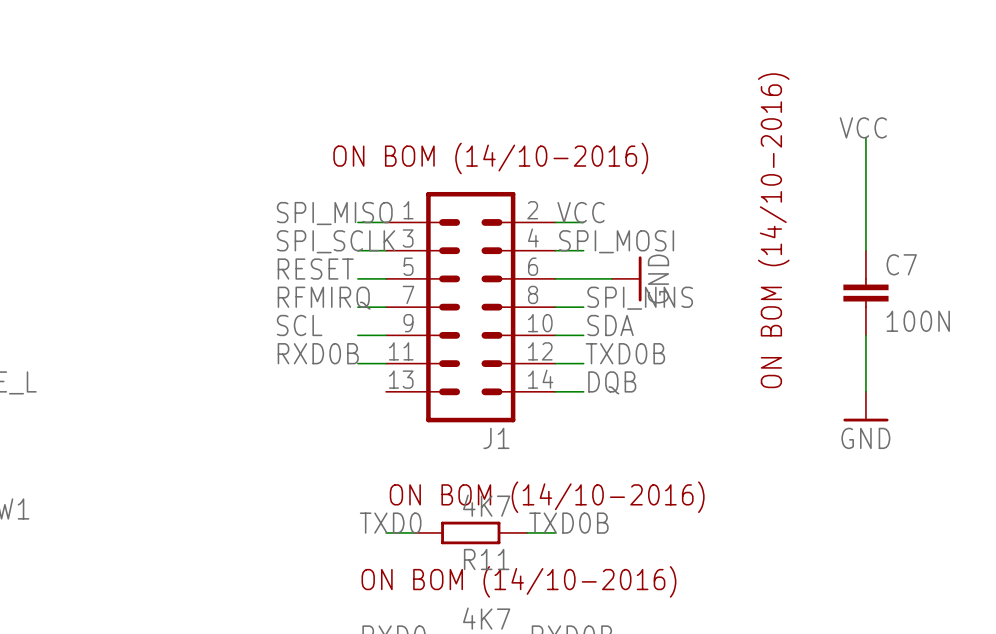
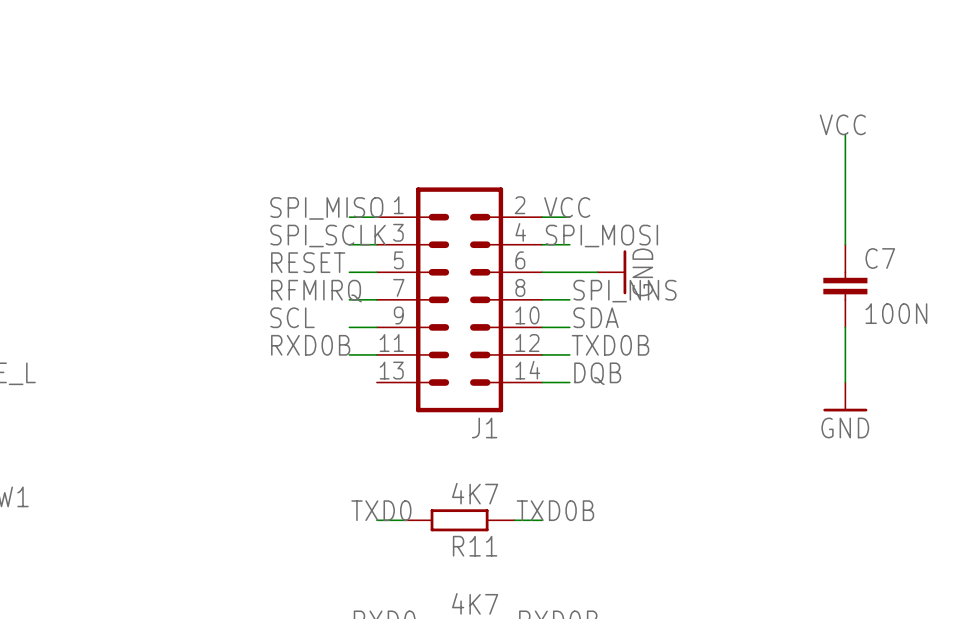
text: ON BOM (14/10-2016) (490, 158) -> none
text: ON BOM (14/10-2016) (773, 230) -> none
text: ON BOM (14/10-2016) (547, 497) -> none
text: ON BOM (14/10-2016) (518, 581) -> none

